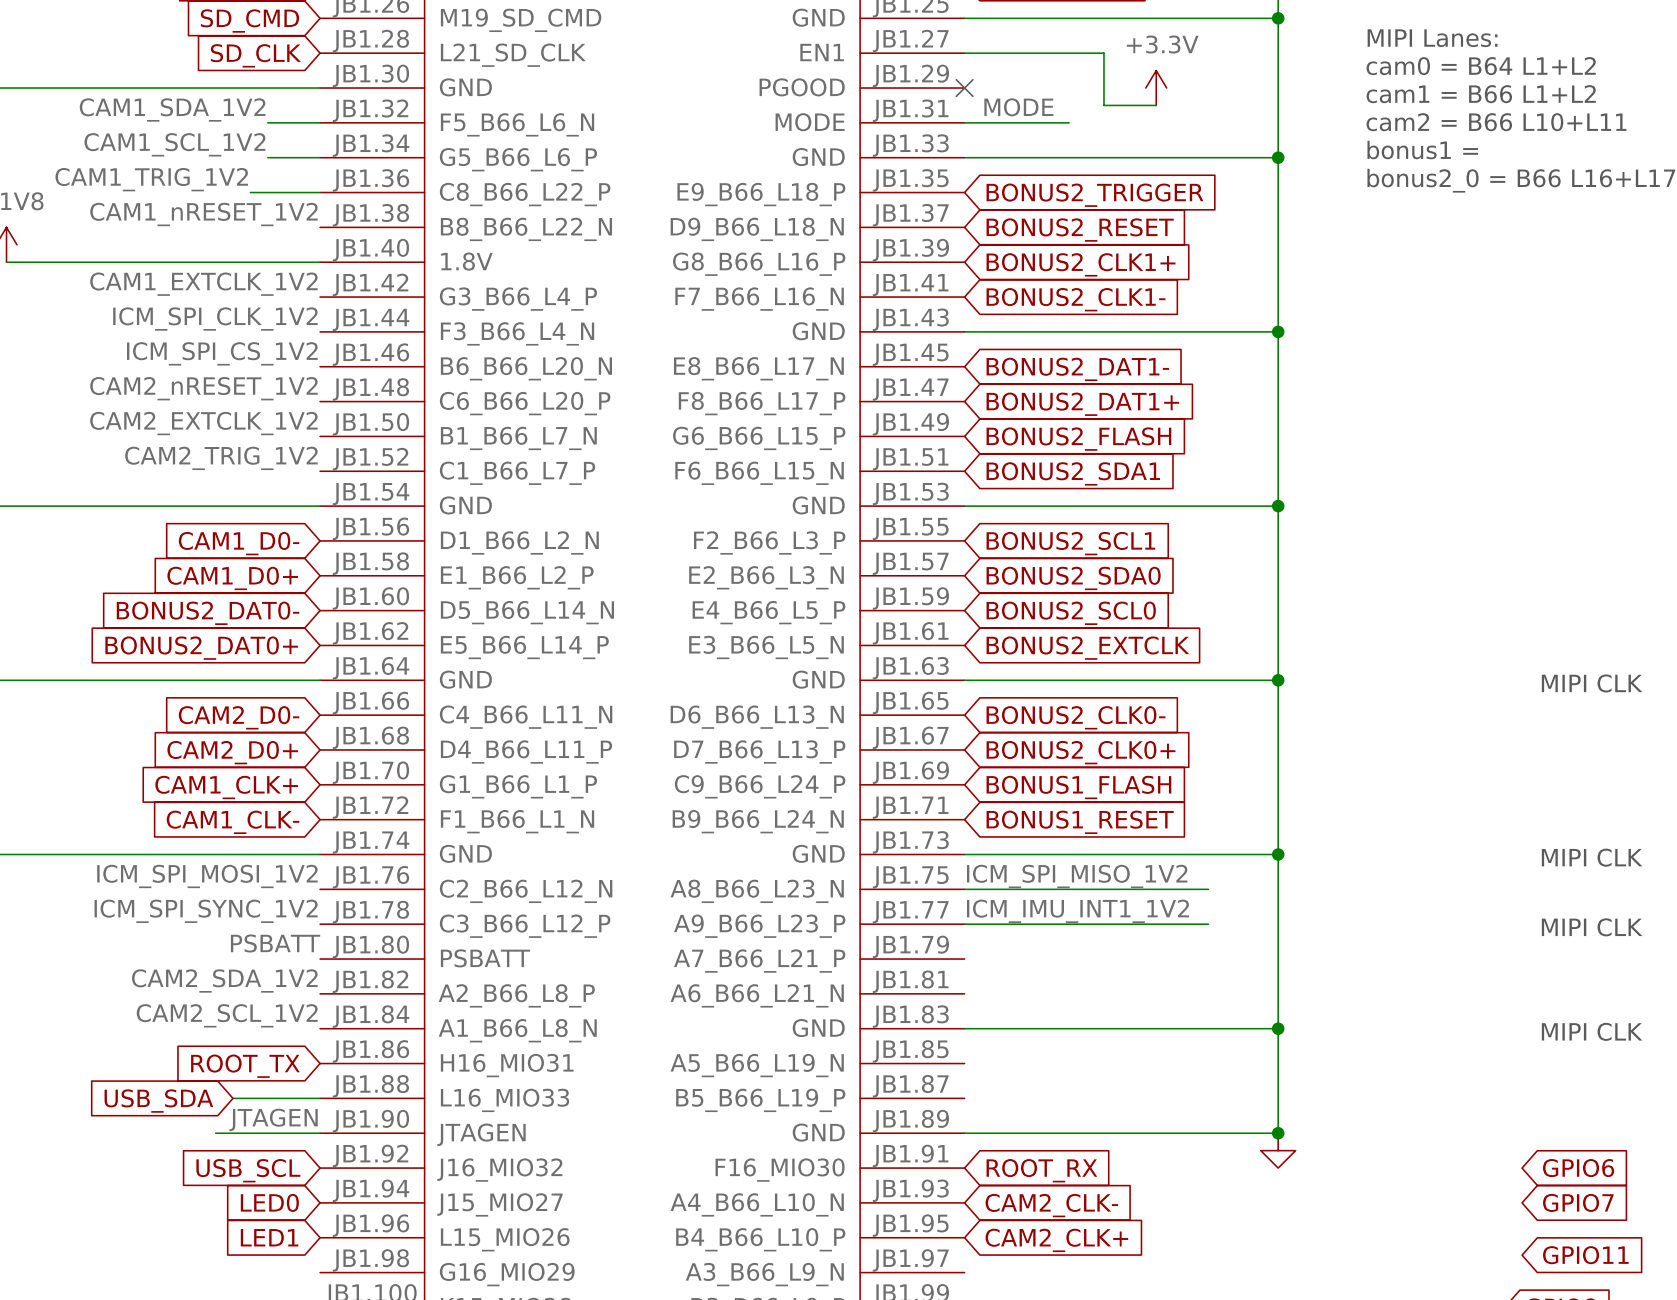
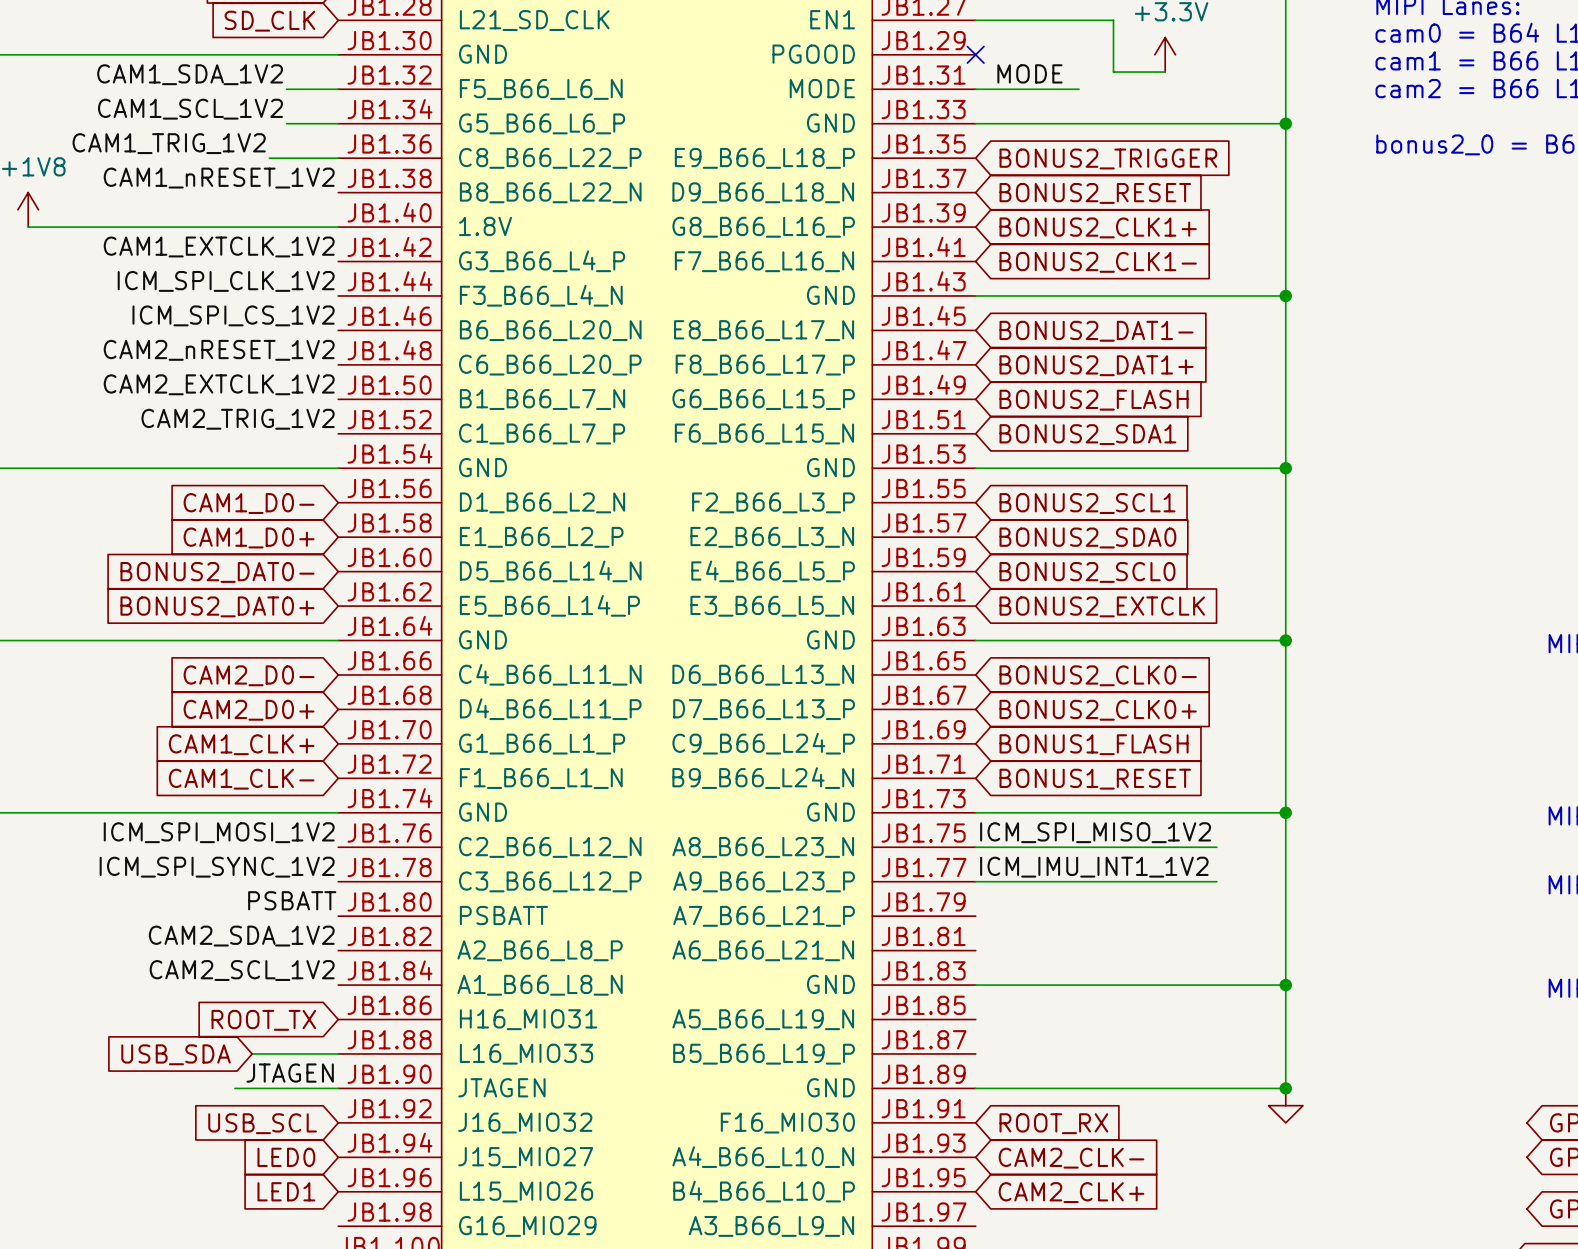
text: bonus1 = (1422, 150) -> none

